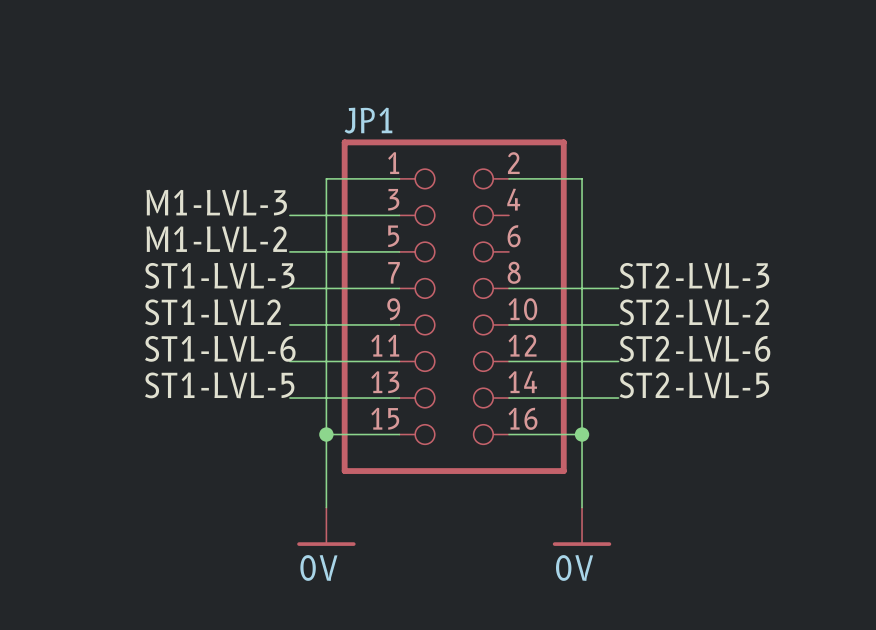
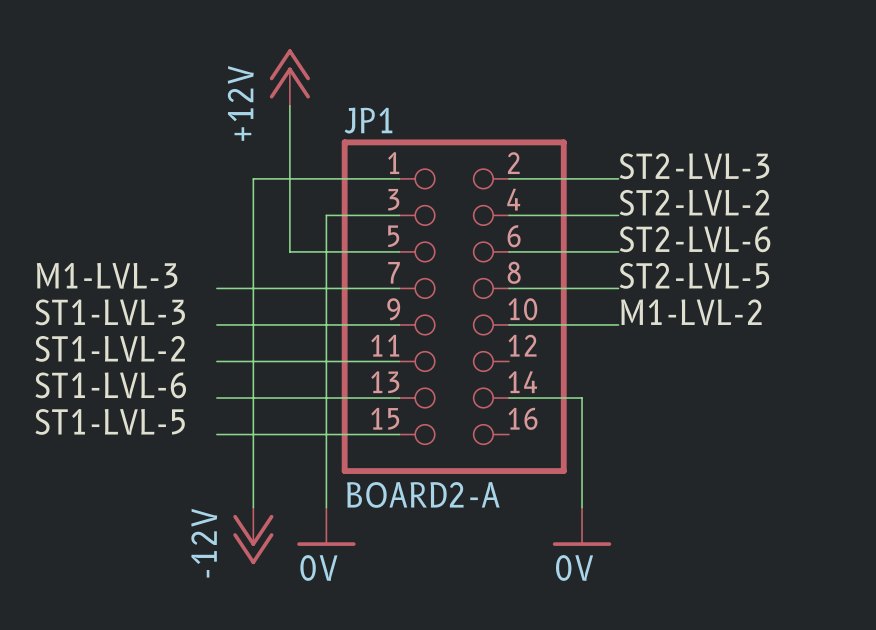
power symbol: none -> +12V (289, 77)
wire: none -> (289, 105) (289, 251)
label: none -> ST2-LVL-3 (694, 166)
wire: (326, 178) (326, 215) (289, 215) -> (326, 178) (253, 178) (253, 507)
wire: (582, 178) (582, 398) (618, 398) -> (582, 178) (618, 178)
label position: M1-LVL-3 (216, 202) -> M1-LVL-3 (107, 275)
label: none -> ST2-LVL-2 (694, 202)
wire: none -> (508, 215) (618, 215)
label: M1-LVL-2 (216, 239) -> none
label position: ST1-LVL-3 (219, 275) -> ST1-LVL-3 (110, 312)
label: ST2-LVL-3 (694, 275) -> ST2-LVL-5 (694, 275)
wire: none -> (216, 288) (289, 288)
label: ST1-LVL2 (212, 312) -> ST1-LVL-2 (110, 348)
label: ST2-LVL-2 (694, 312) -> M1-LVL-2 (691, 312)
wire: none -> (216, 324) (289, 324)
label position: ST1-LVL-6 (220, 348) -> ST1-LVL-6 (110, 385)
label position: ST2-LVL-6 (695, 348) -> ST2-LVL-6 (695, 239)
wire: none -> (216, 361) (289, 361)
wire: (508, 361) (618, 361) -> (508, 251) (618, 251)
label position: ST1-LVL-5 (219, 385) -> ST1-LVL-5 (110, 421)
label: ST2-LVL-5 (694, 385) -> none
wire: none -> (216, 434) (326, 434)
junction: (326, 434) -> none
wire: (508, 434) (582, 434) -> (216, 398) (289, 398)
junction: (582, 434) -> none
JP1 value: none -> BOARD2-A (423, 494)
power symbol: none -> -12V (253, 535)

